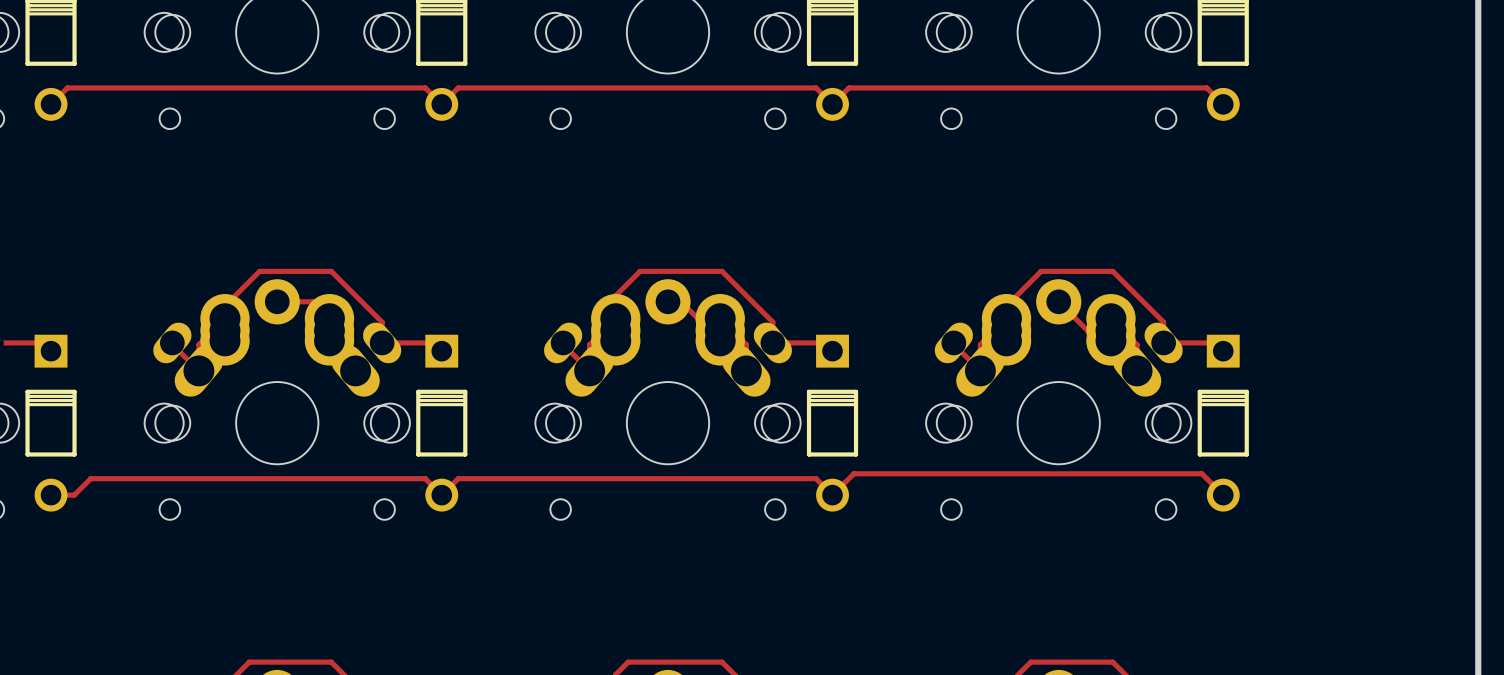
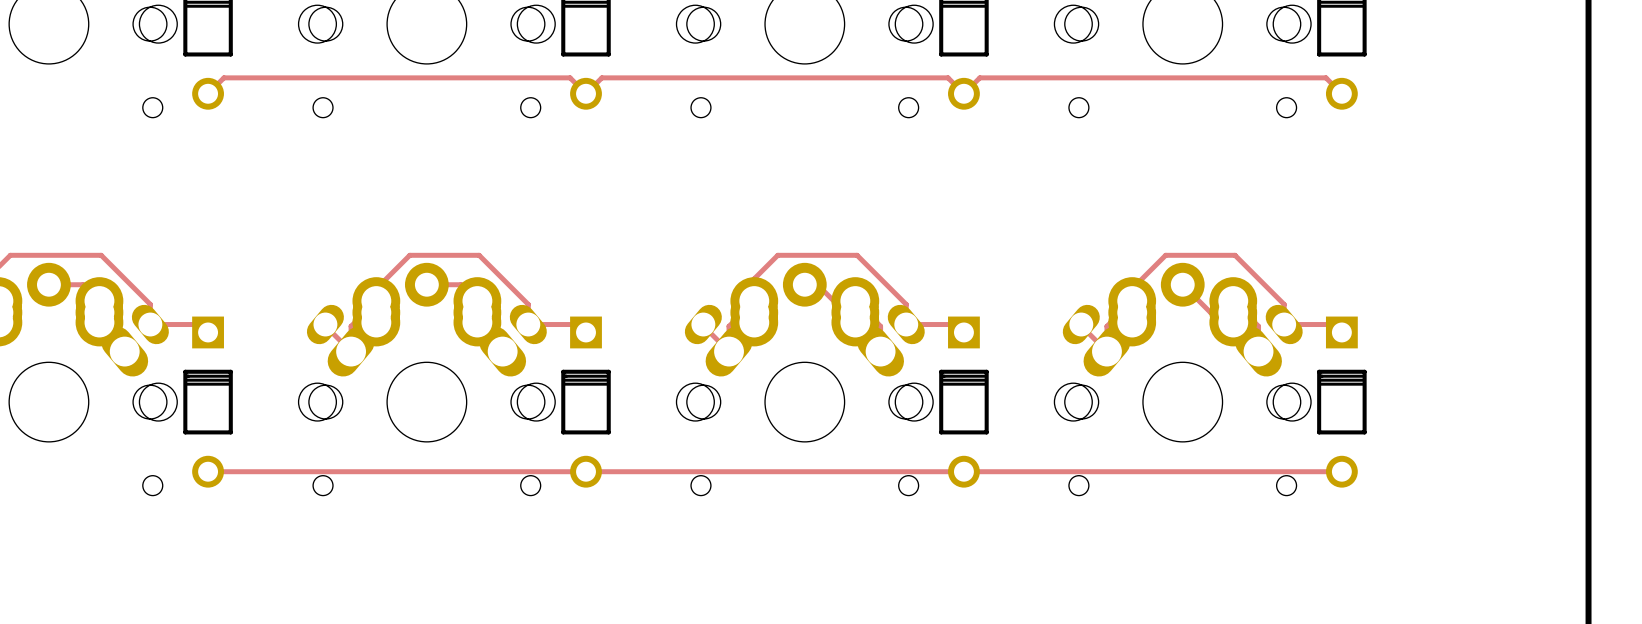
track: (74, 495) (90, 478) (425, 478) (441, 495) (458, 478) (816, 478) (832, 495) (853, 473) (1201, 473) (1223, 495) -> (230, 471) (1341, 471)

